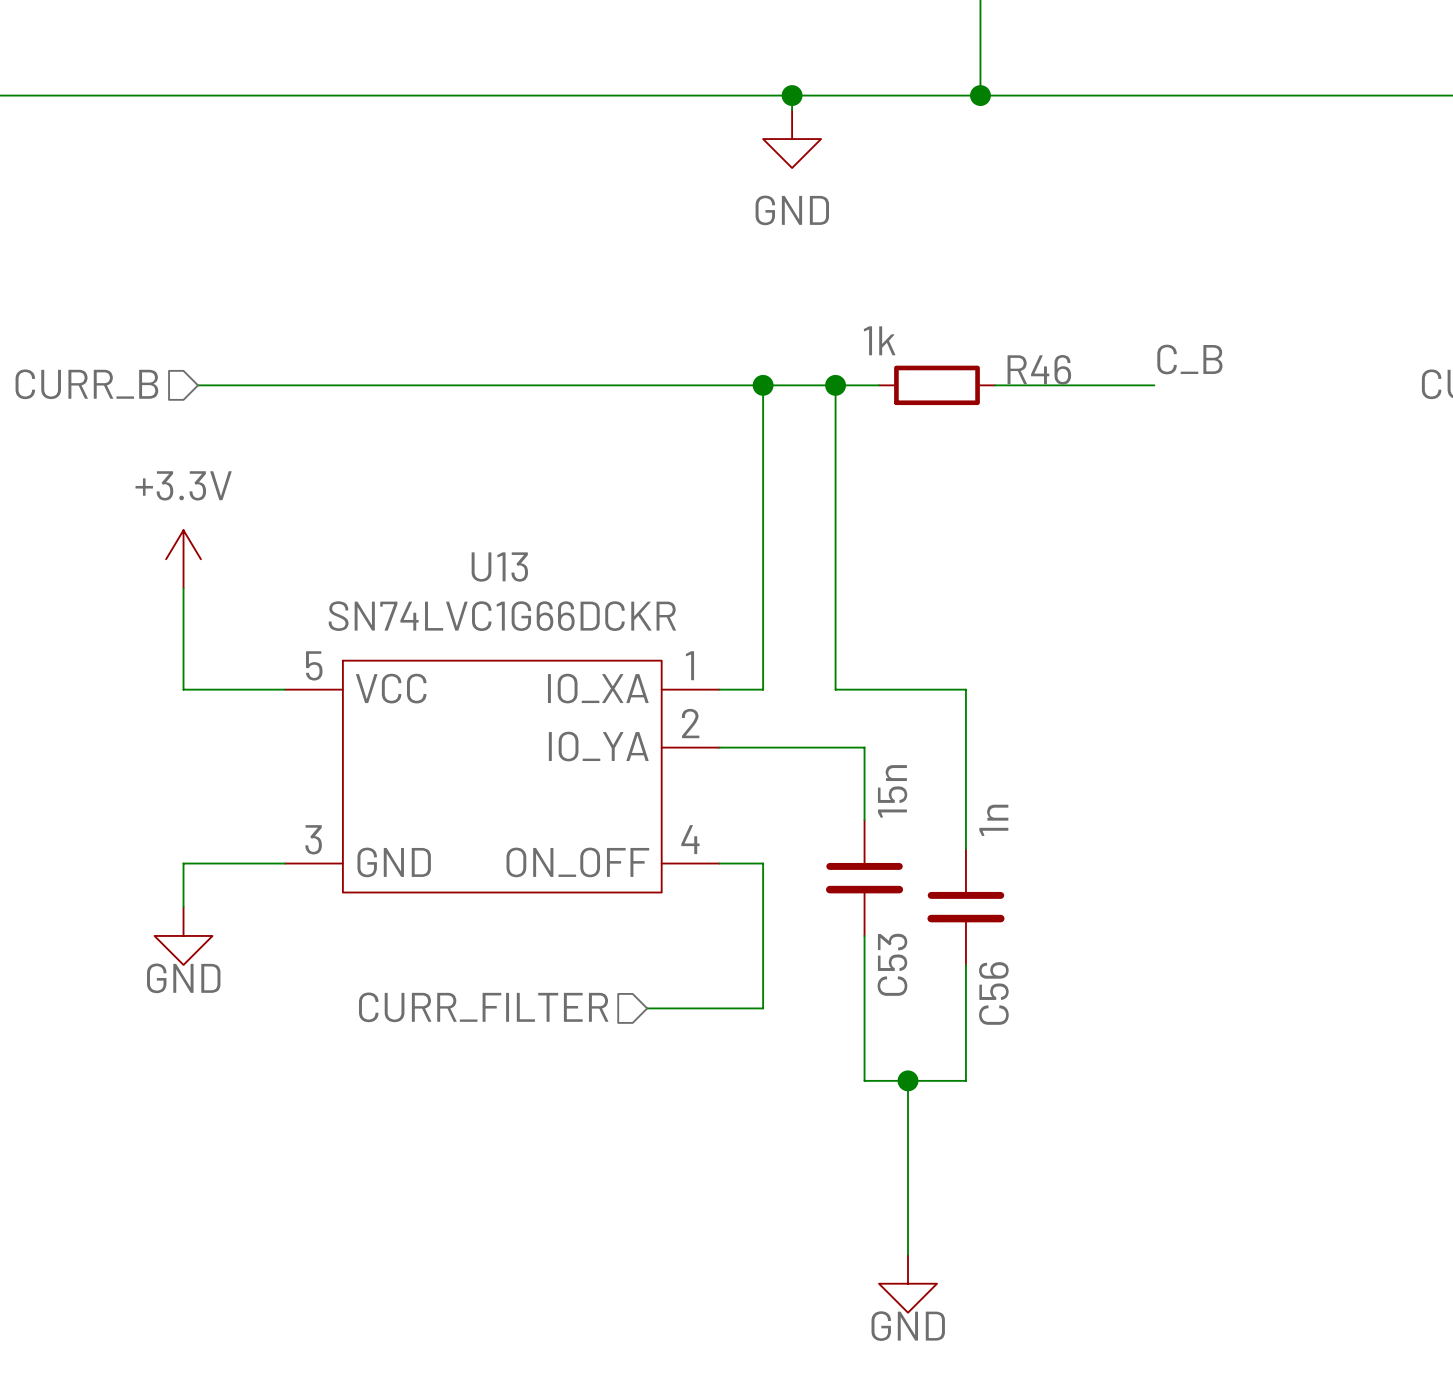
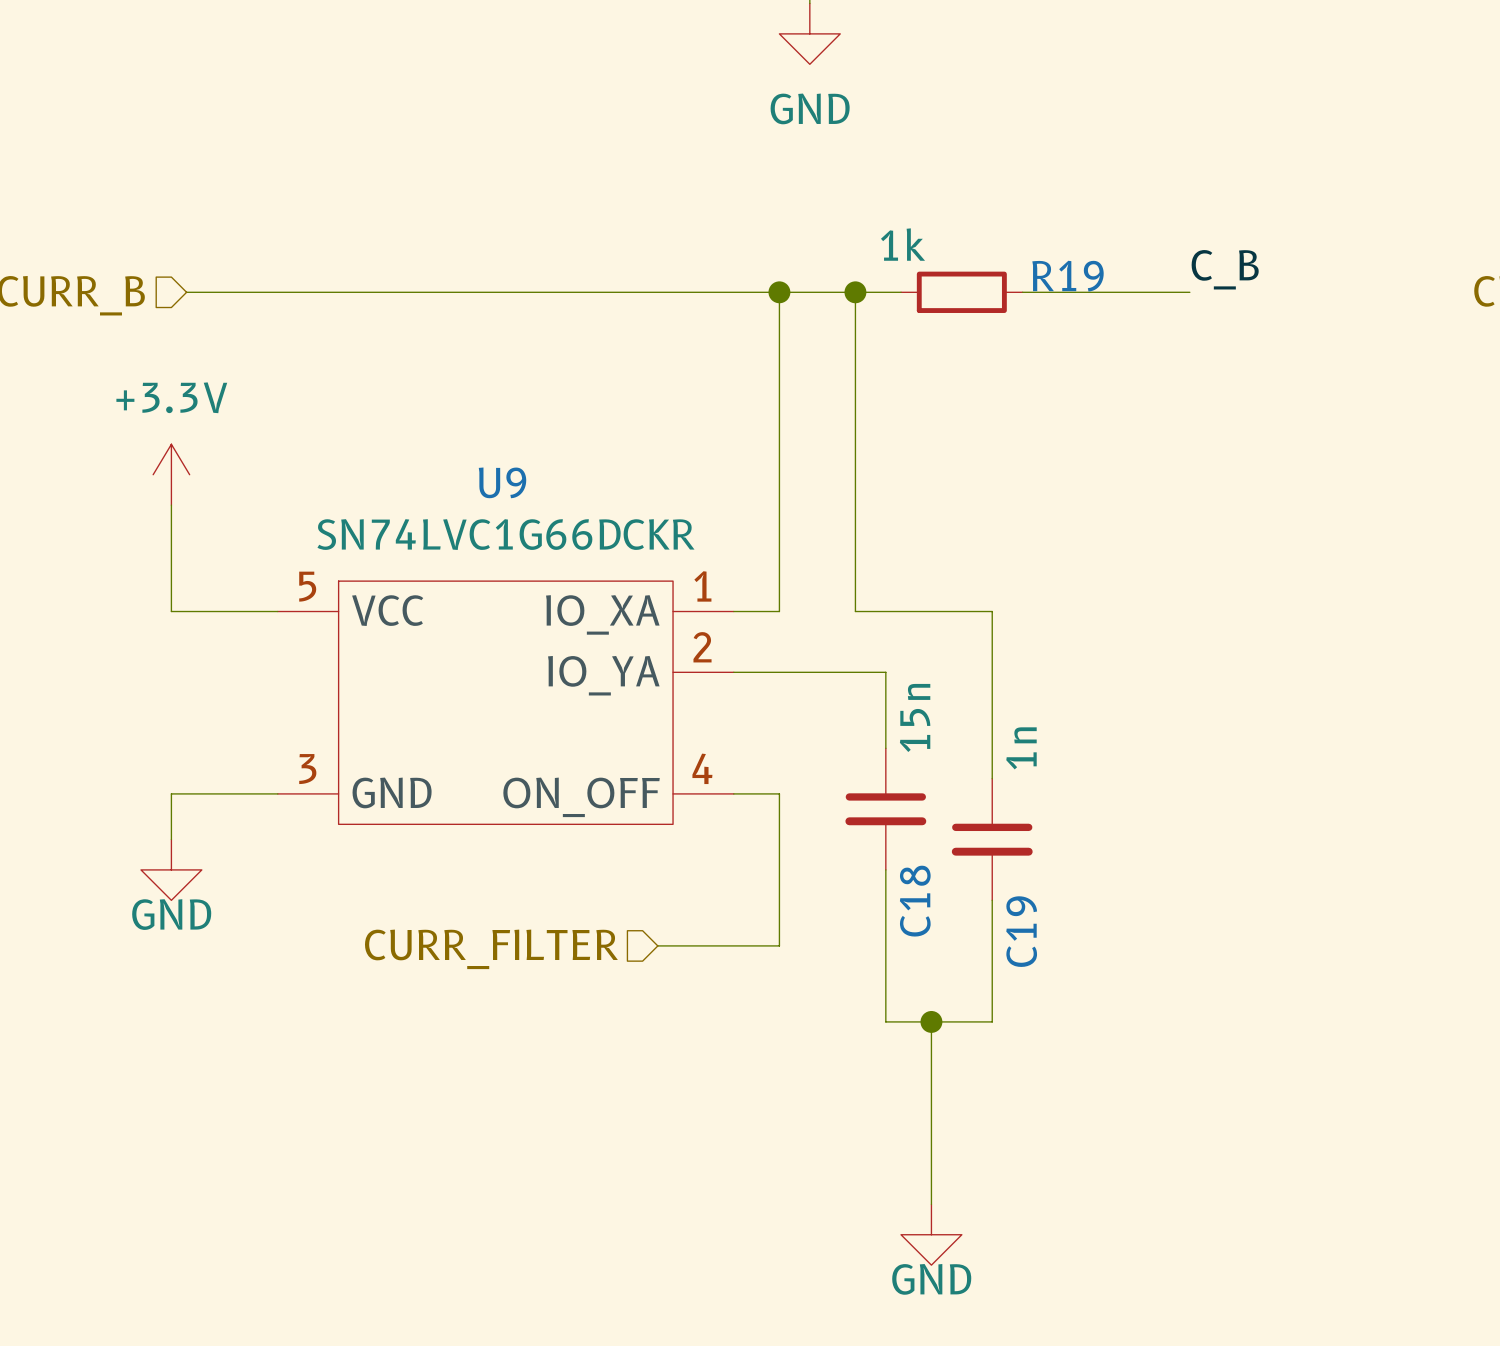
R46 name: R46 (1039, 369) -> R19 (1068, 276)
U13 name: U13 (499, 567) -> U9 (502, 482)
C53 name: C53 (892, 964) -> C18 (915, 901)
C56 name: C56 (993, 993) -> C19 (1021, 931)

